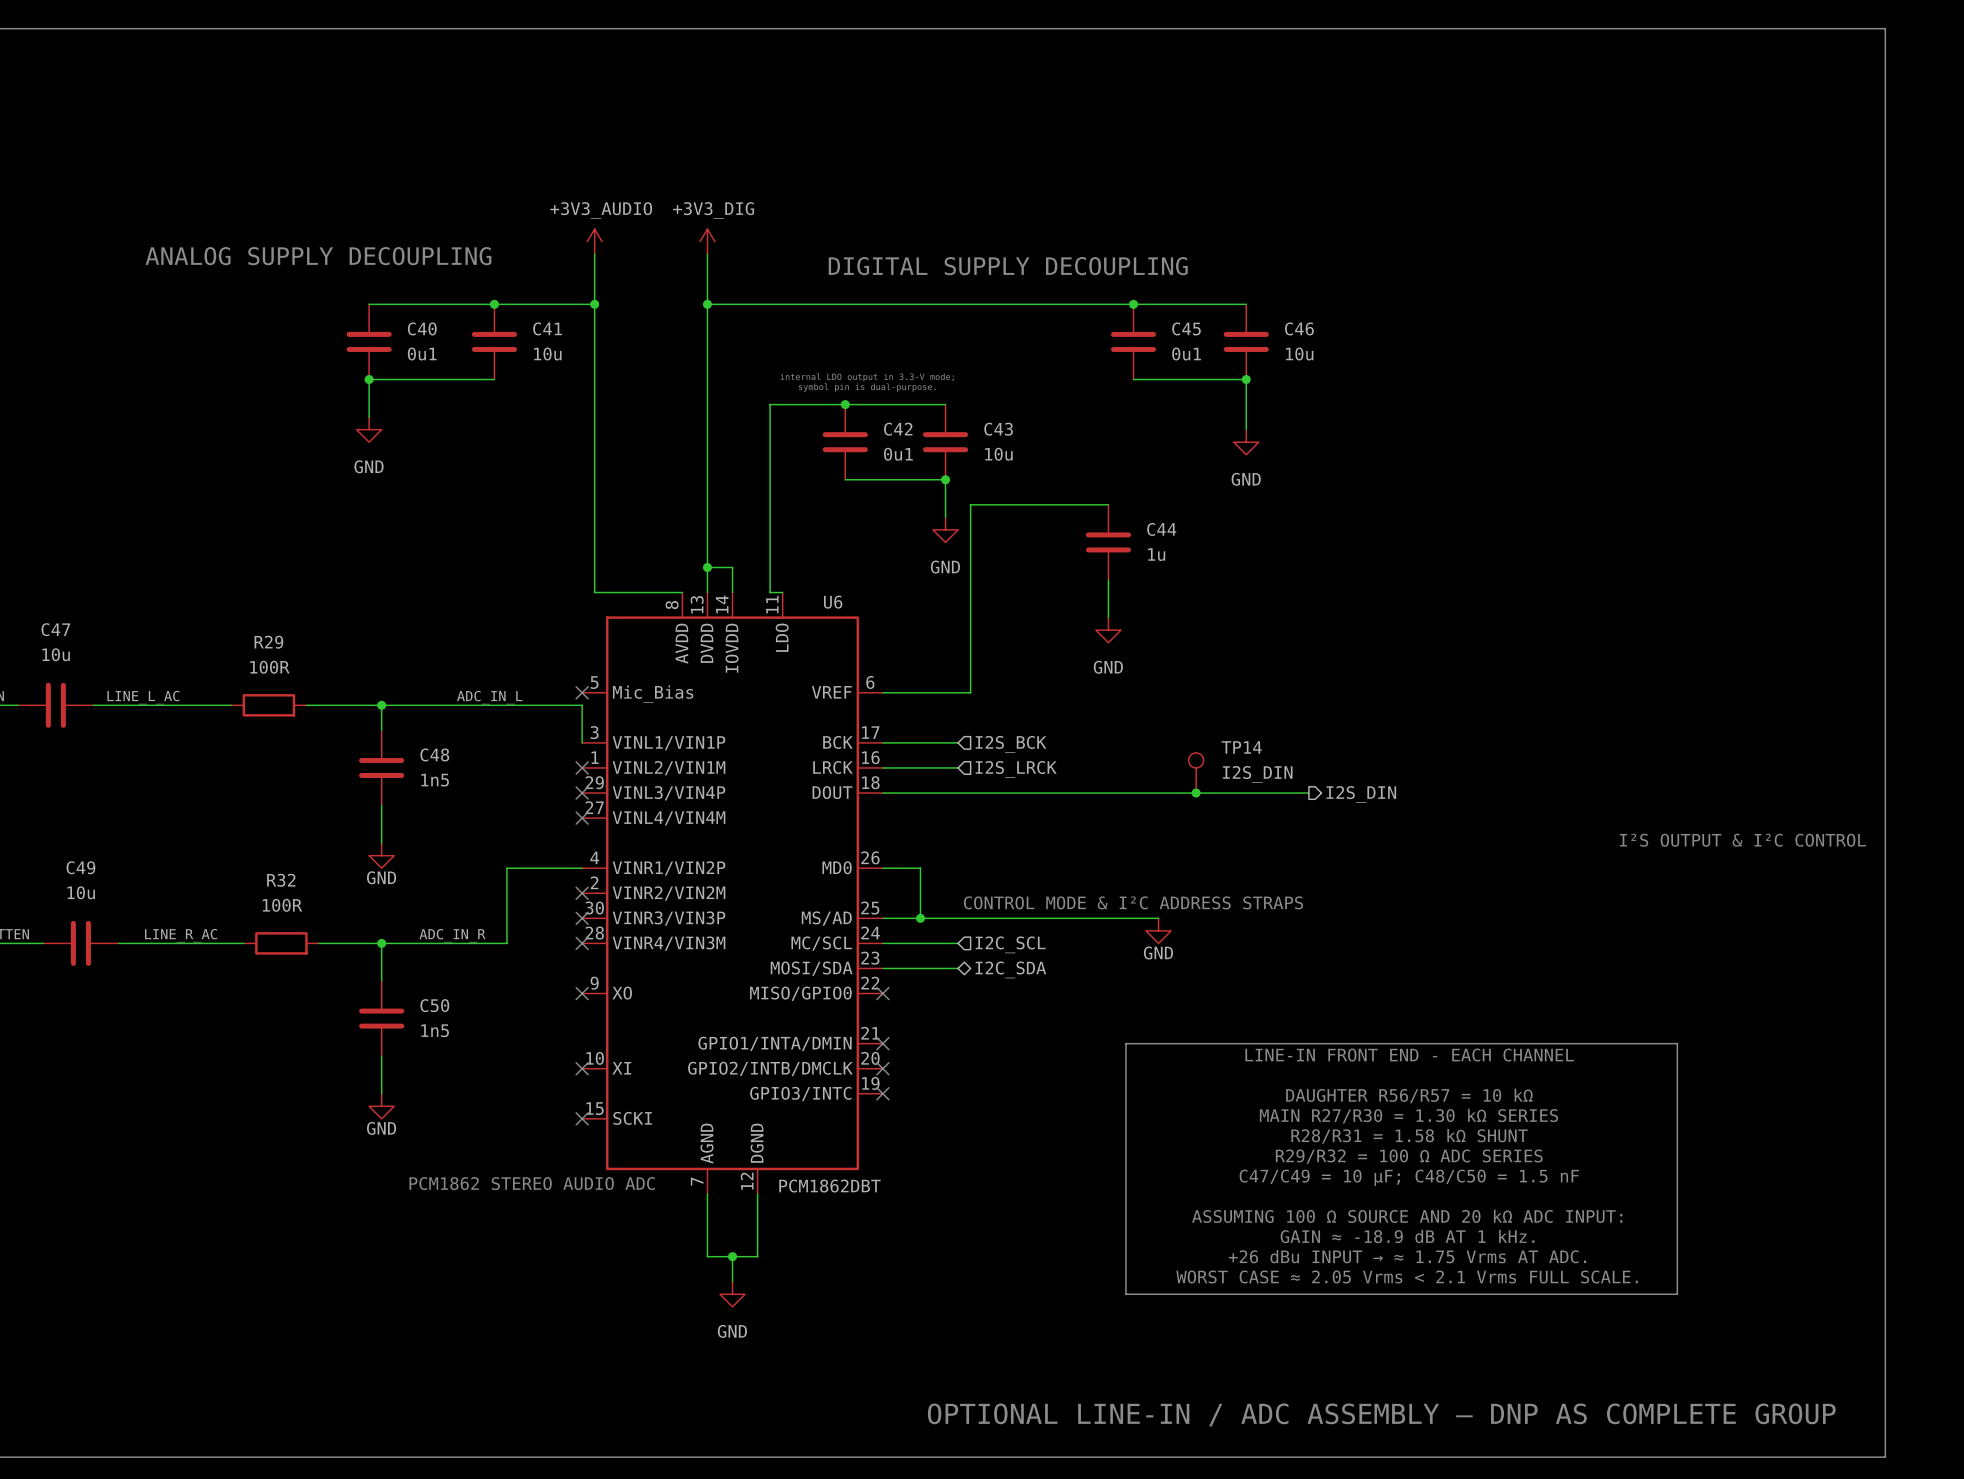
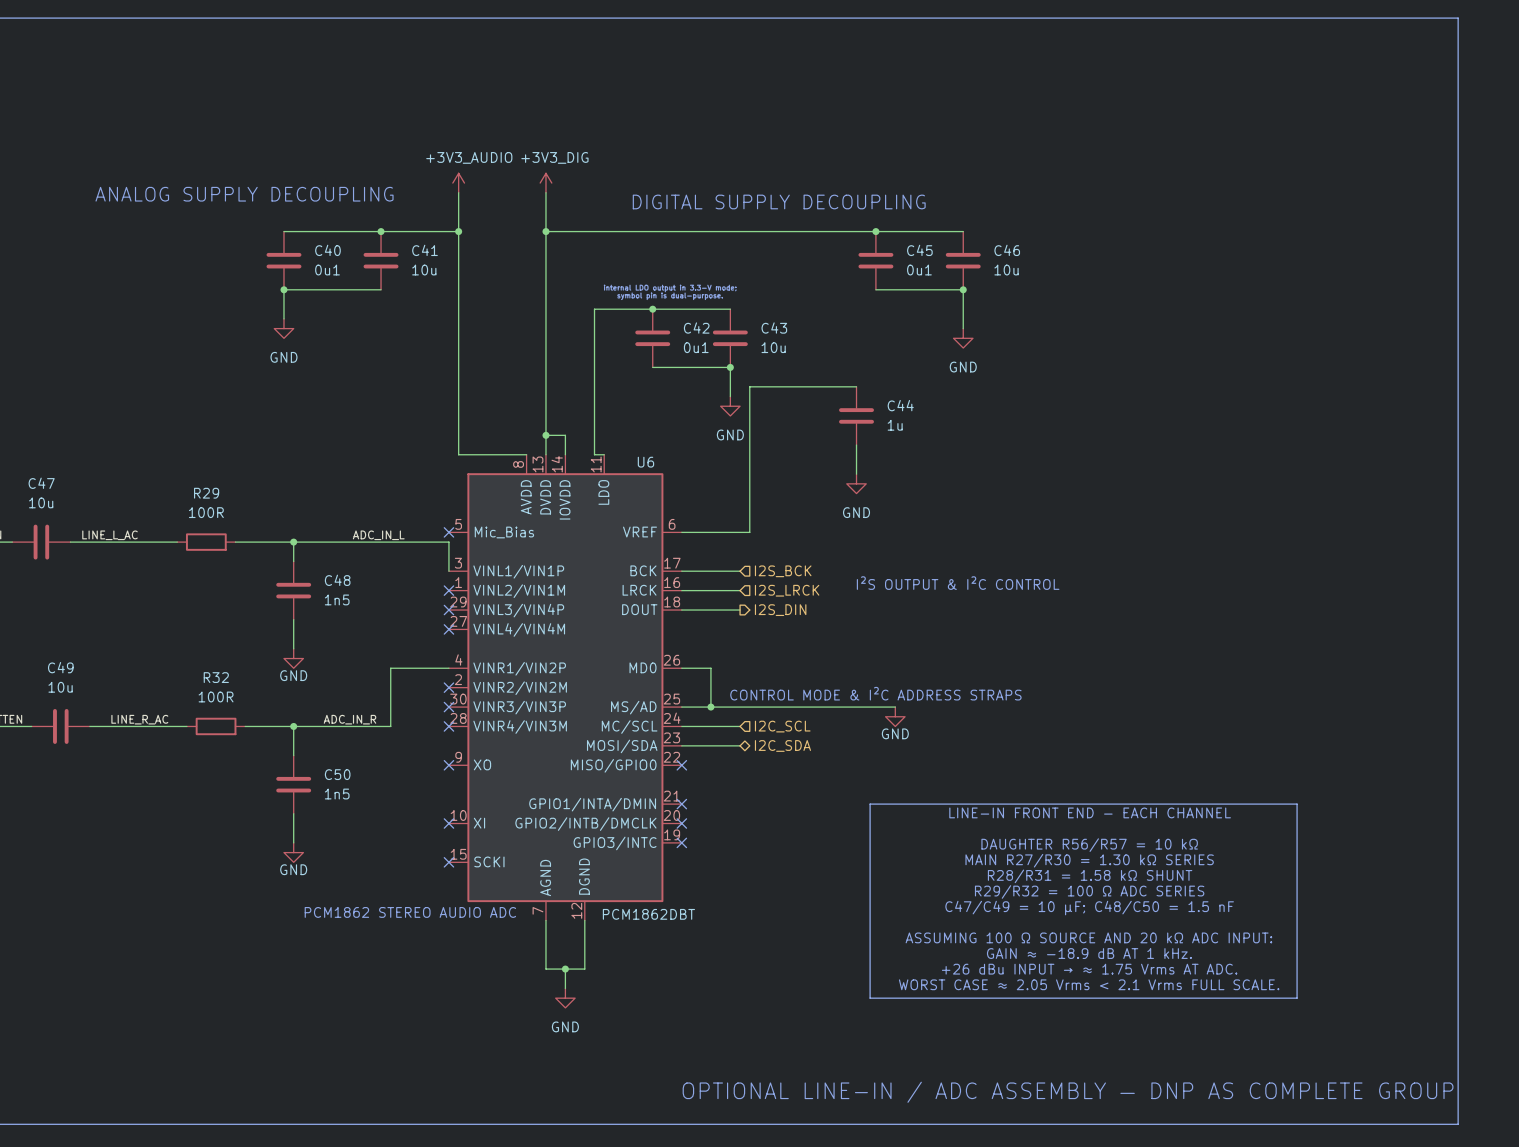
text: none -> I²S OUTPUT & I²C CONTROL (958, 583)
TP14: I2S_DIN (1196, 772) -> none
wire: (958, 793) (1308, 793) -> none
junction: (1196, 793) -> none
hierarchical label: none -> I2S_DIN (780, 610)
hierarchical label: I2S_DIN (1361, 794) -> none
text: I²S OUTPUT & I²C CONTROL (1742, 840) -> none

